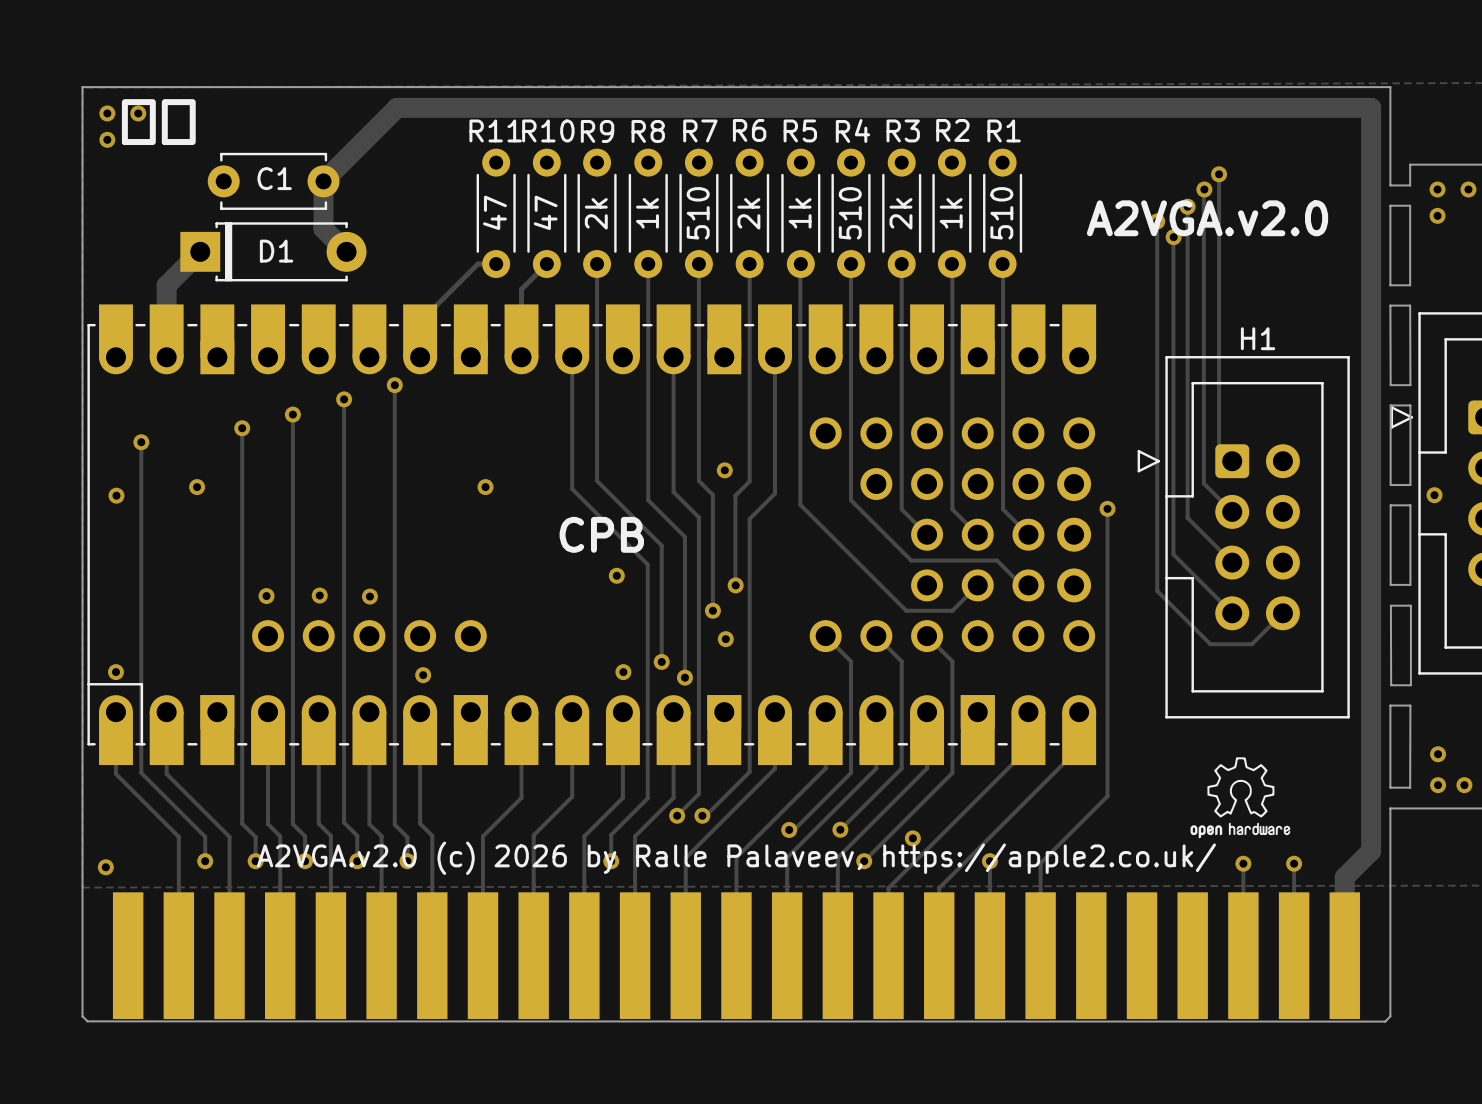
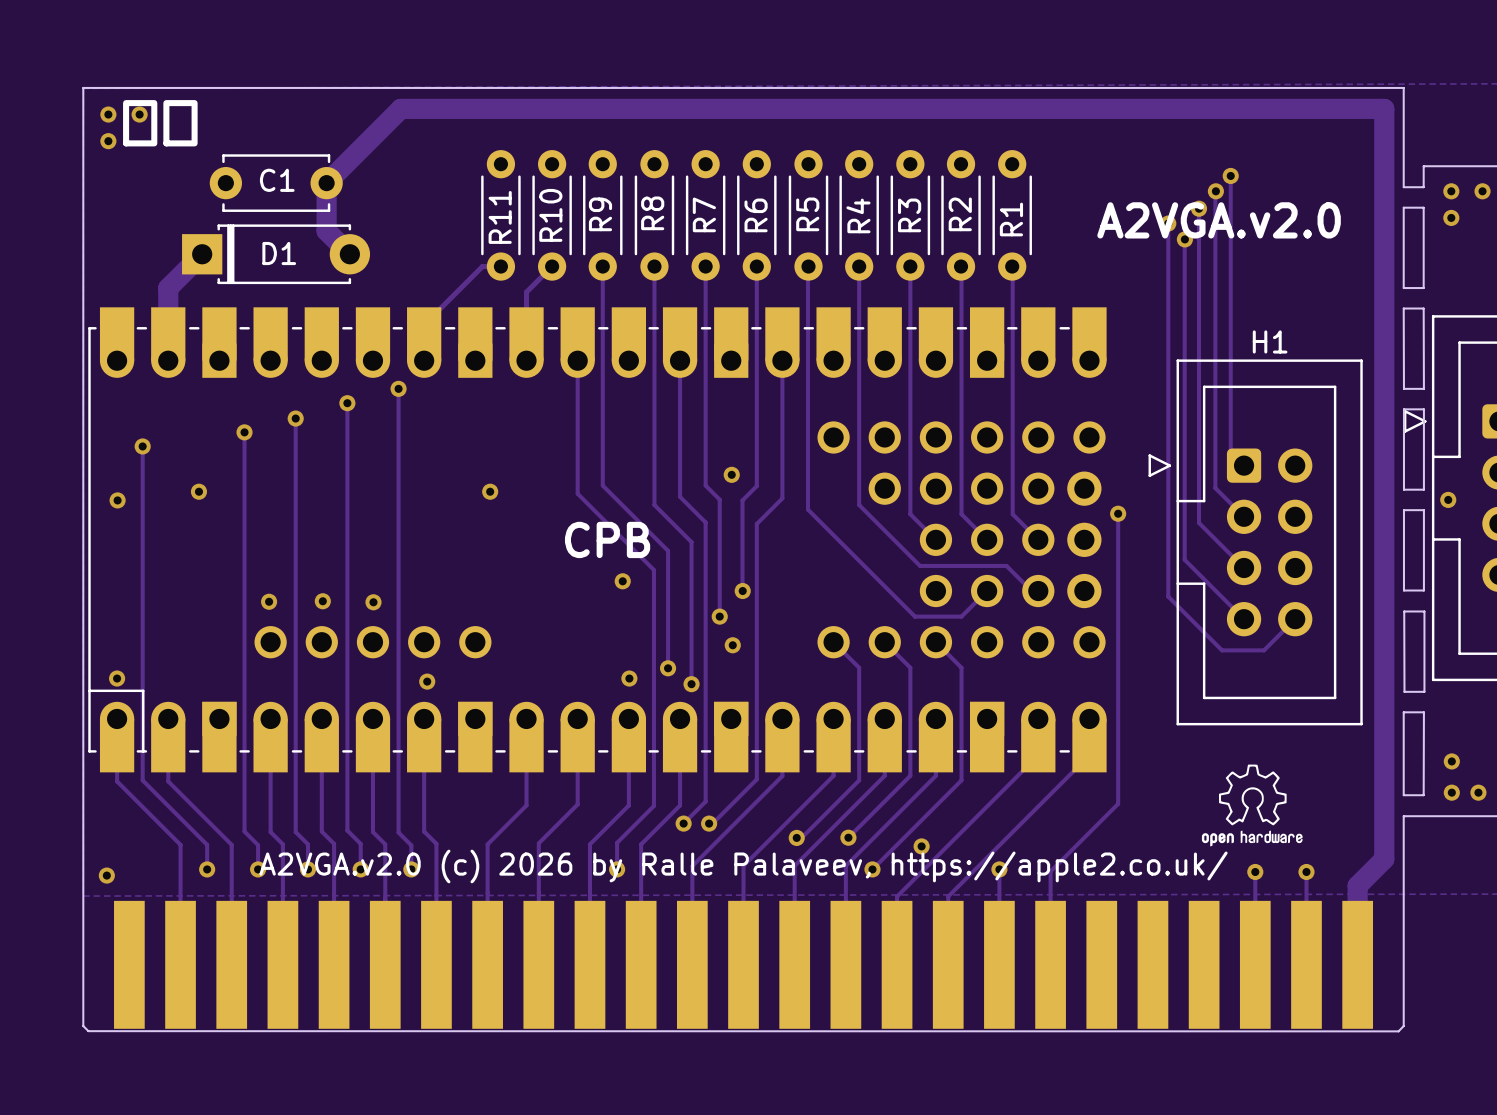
R11 name rotation: 0° (495, 130) -> 90° counterclockwise (500, 217)
R11 name position: R11 (495, 130) -> R11 (500, 217)
R10 name rotation: 0° (548, 130) -> 90° counterclockwise (550, 215)
R10 name position: R10 (548, 130) -> R10 (550, 215)
R7 name rotation: 0° (700, 130) -> 90° counterclockwise (704, 214)
R7 name position: R7 (700, 130) -> R7 (704, 214)
R6 name rotation: 0° (749, 130) -> 90° counterclockwise (756, 215)
R6 name position: R6 (749, 130) -> R6 (756, 215)
R5 name rotation: 0° (800, 130) -> 90° counterclockwise (807, 214)
R5 name position: R5 (800, 130) -> R5 (807, 214)
R4 name rotation: 0° (852, 130) -> 90° counterclockwise (858, 215)
R4 name position: R4 (852, 130) -> R4 (858, 215)
R3 name rotation: 0° (903, 130) -> 90° counterclockwise (909, 215)
R3 name position: R3 (903, 130) -> R3 (909, 215)
R2 name rotation: 0° (952, 130) -> 90° counterclockwise (960, 214)
R2 name position: R2 (952, 130) -> R2 (960, 214)
R1 name rotation: 0° (1004, 130) -> 90° counterclockwise (1011, 219)
R1 name position: R1 (1004, 130) -> R1 (1011, 219)
R9 name rotation: 0° (597, 131) -> 90° counterclockwise (600, 214)
R9 name position: R9 (597, 131) -> R9 (600, 214)
R8 name rotation: 0° (648, 131) -> 90° counterclockwise (652, 213)
R8 name position: R8 (648, 131) -> R8 (652, 213)
R11 value: 47 (494, 212) -> none
R10 value: 47 (545, 212) -> none
R9 value: 2k (596, 213) -> none
R8 value: 1k (647, 213) -> none
R7 value: 510 (698, 213) -> none
R6 value: 2k (748, 213) -> none
R5 value: 1k (800, 213) -> none
R4 value: 510 (850, 213) -> none
R3 value: 2k (900, 213) -> none
R2 value: 1k (951, 213) -> none
R1 value: 510 (1001, 213) -> none

